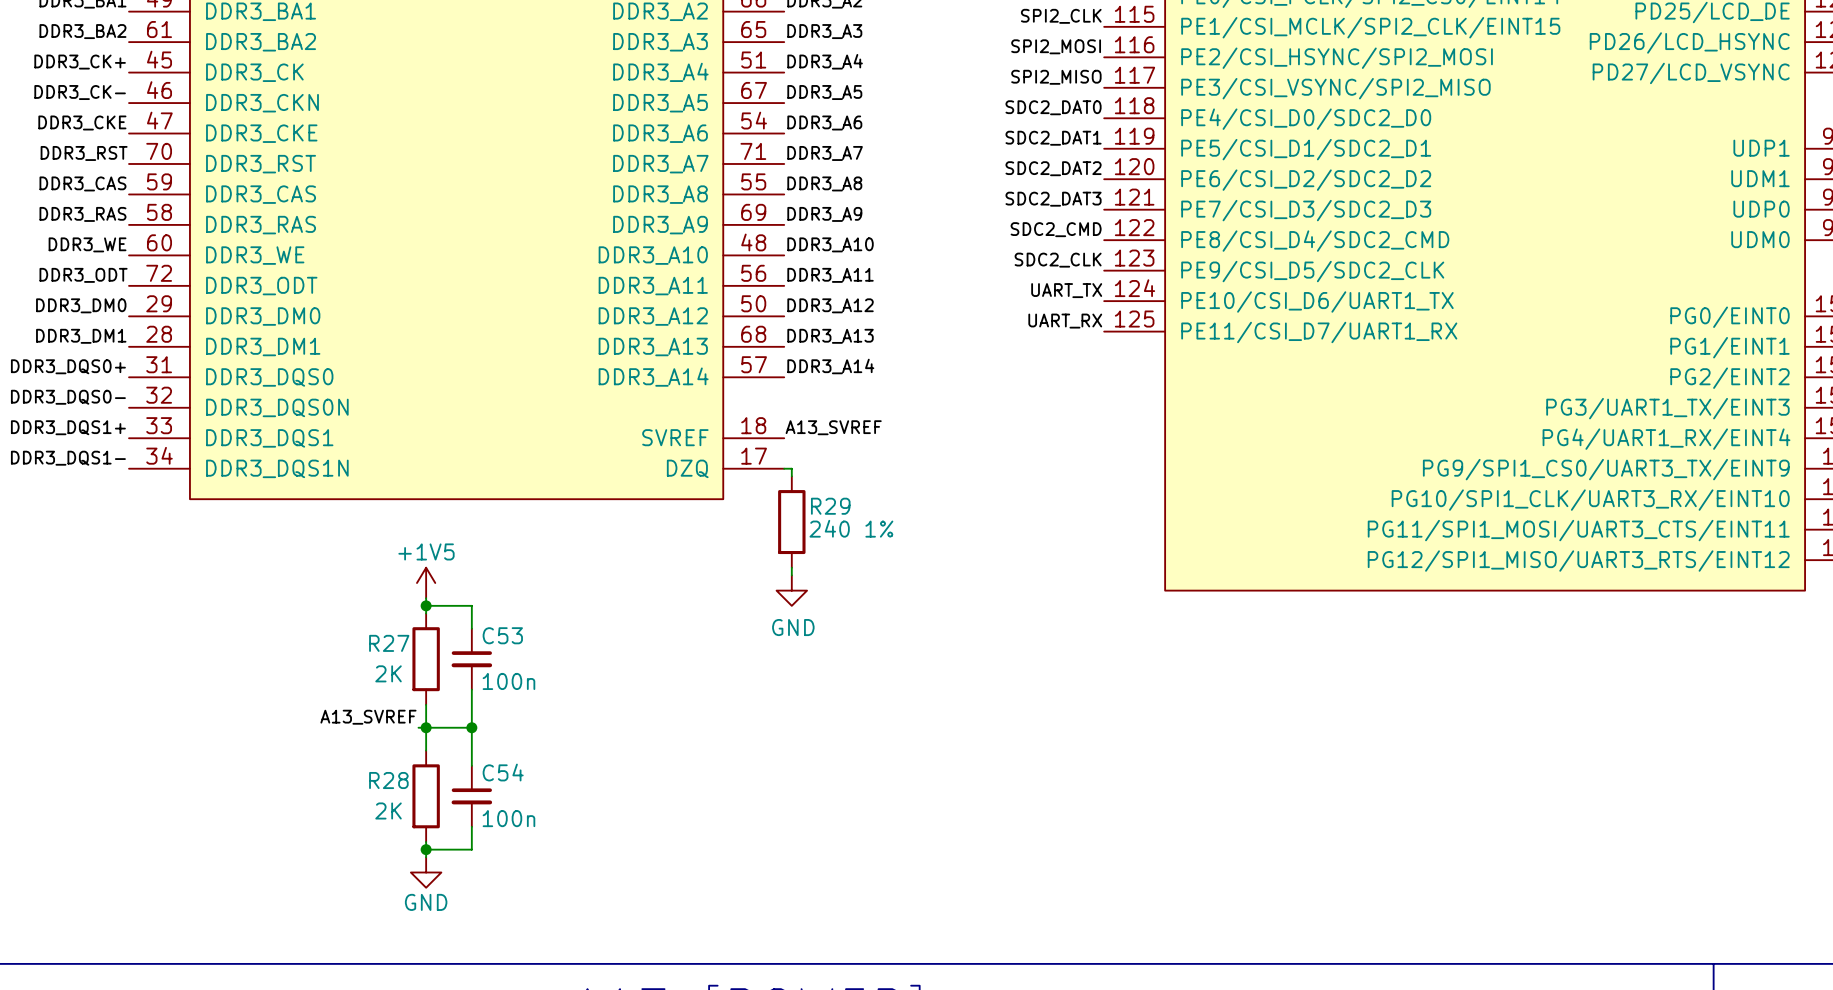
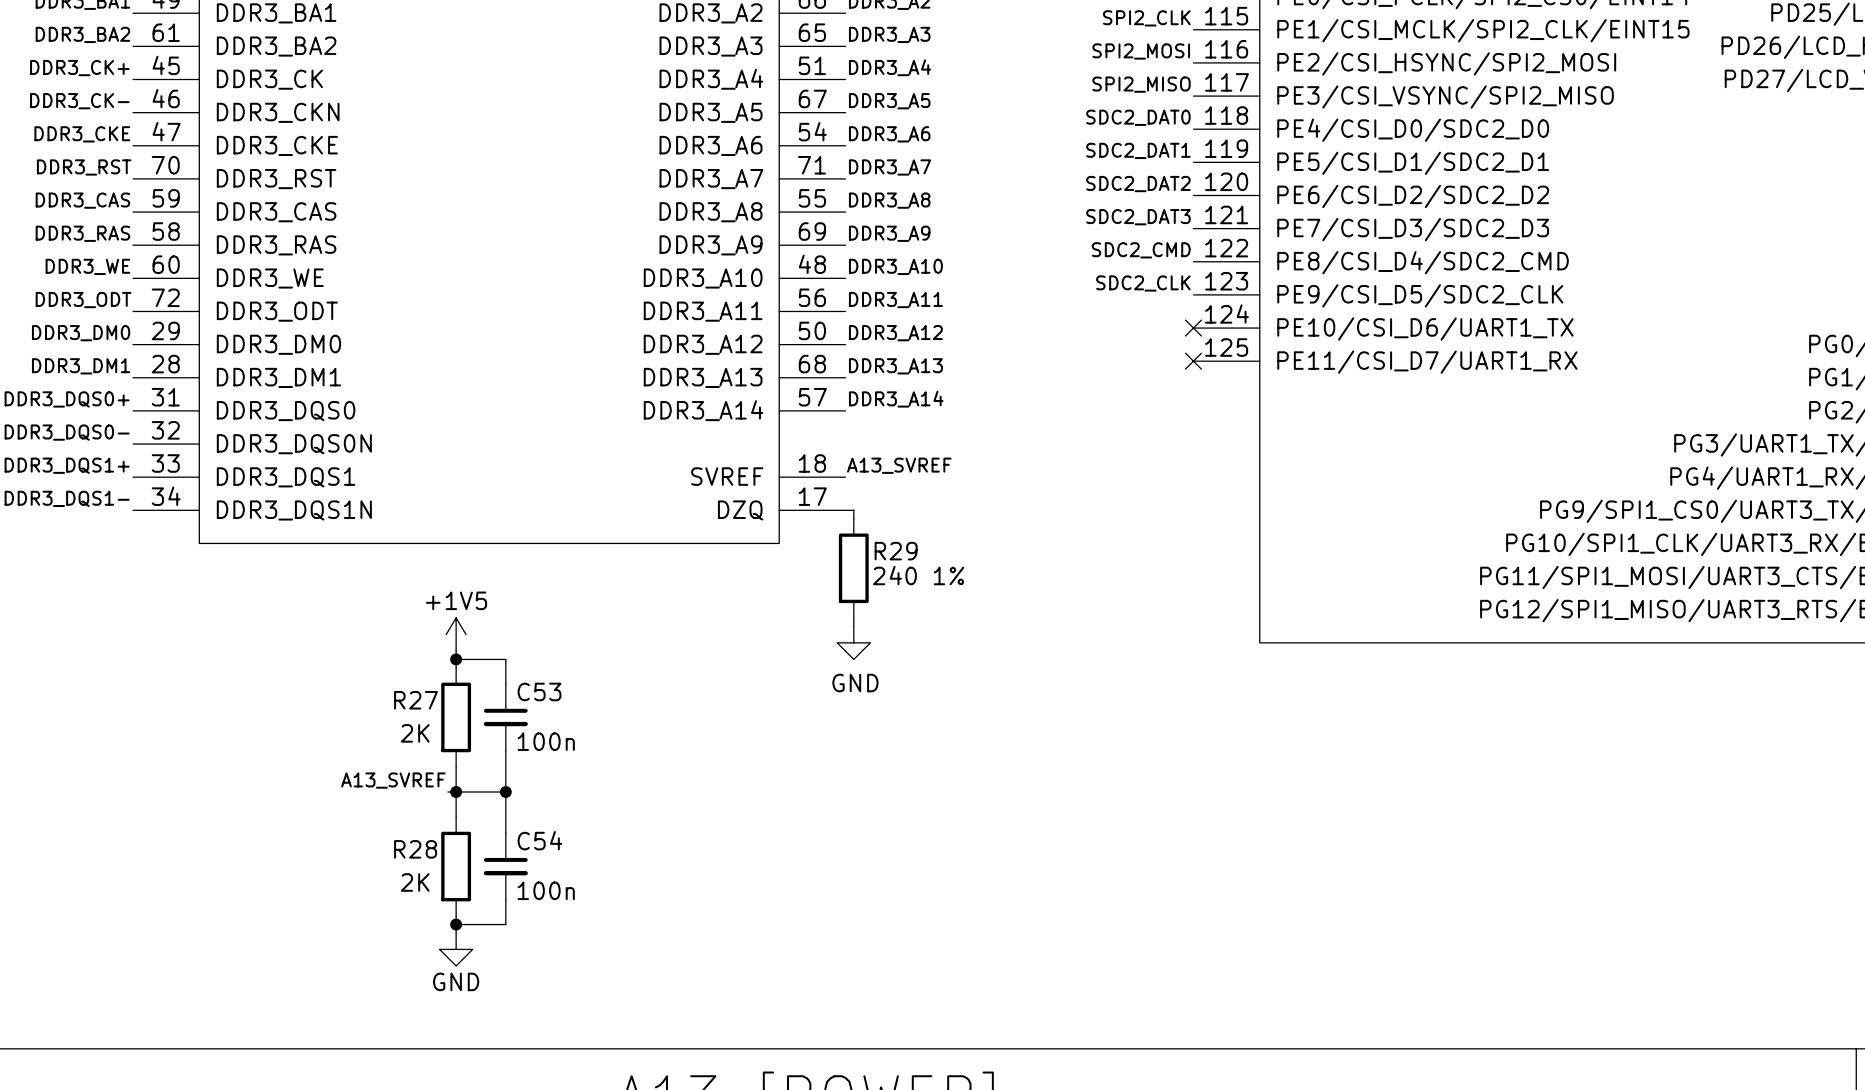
label: UART_TX (1066, 290) -> none
no-connect mark: none -> (1193, 328)
label: UART_RX (1065, 321) -> none
no-connect mark: none -> (1193, 361)

